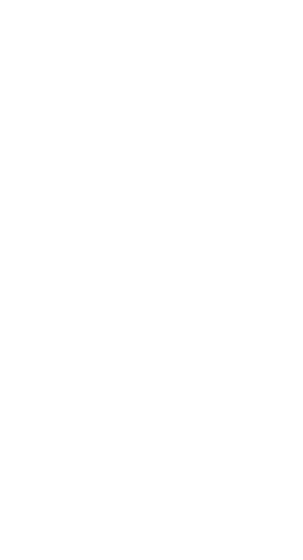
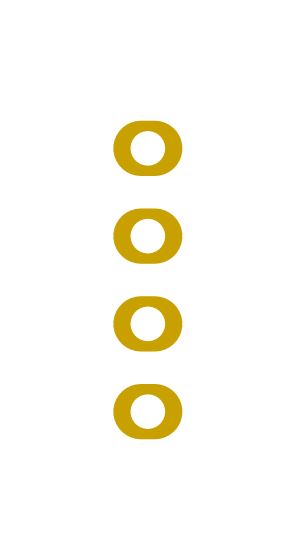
part: none -> (147, 280)

